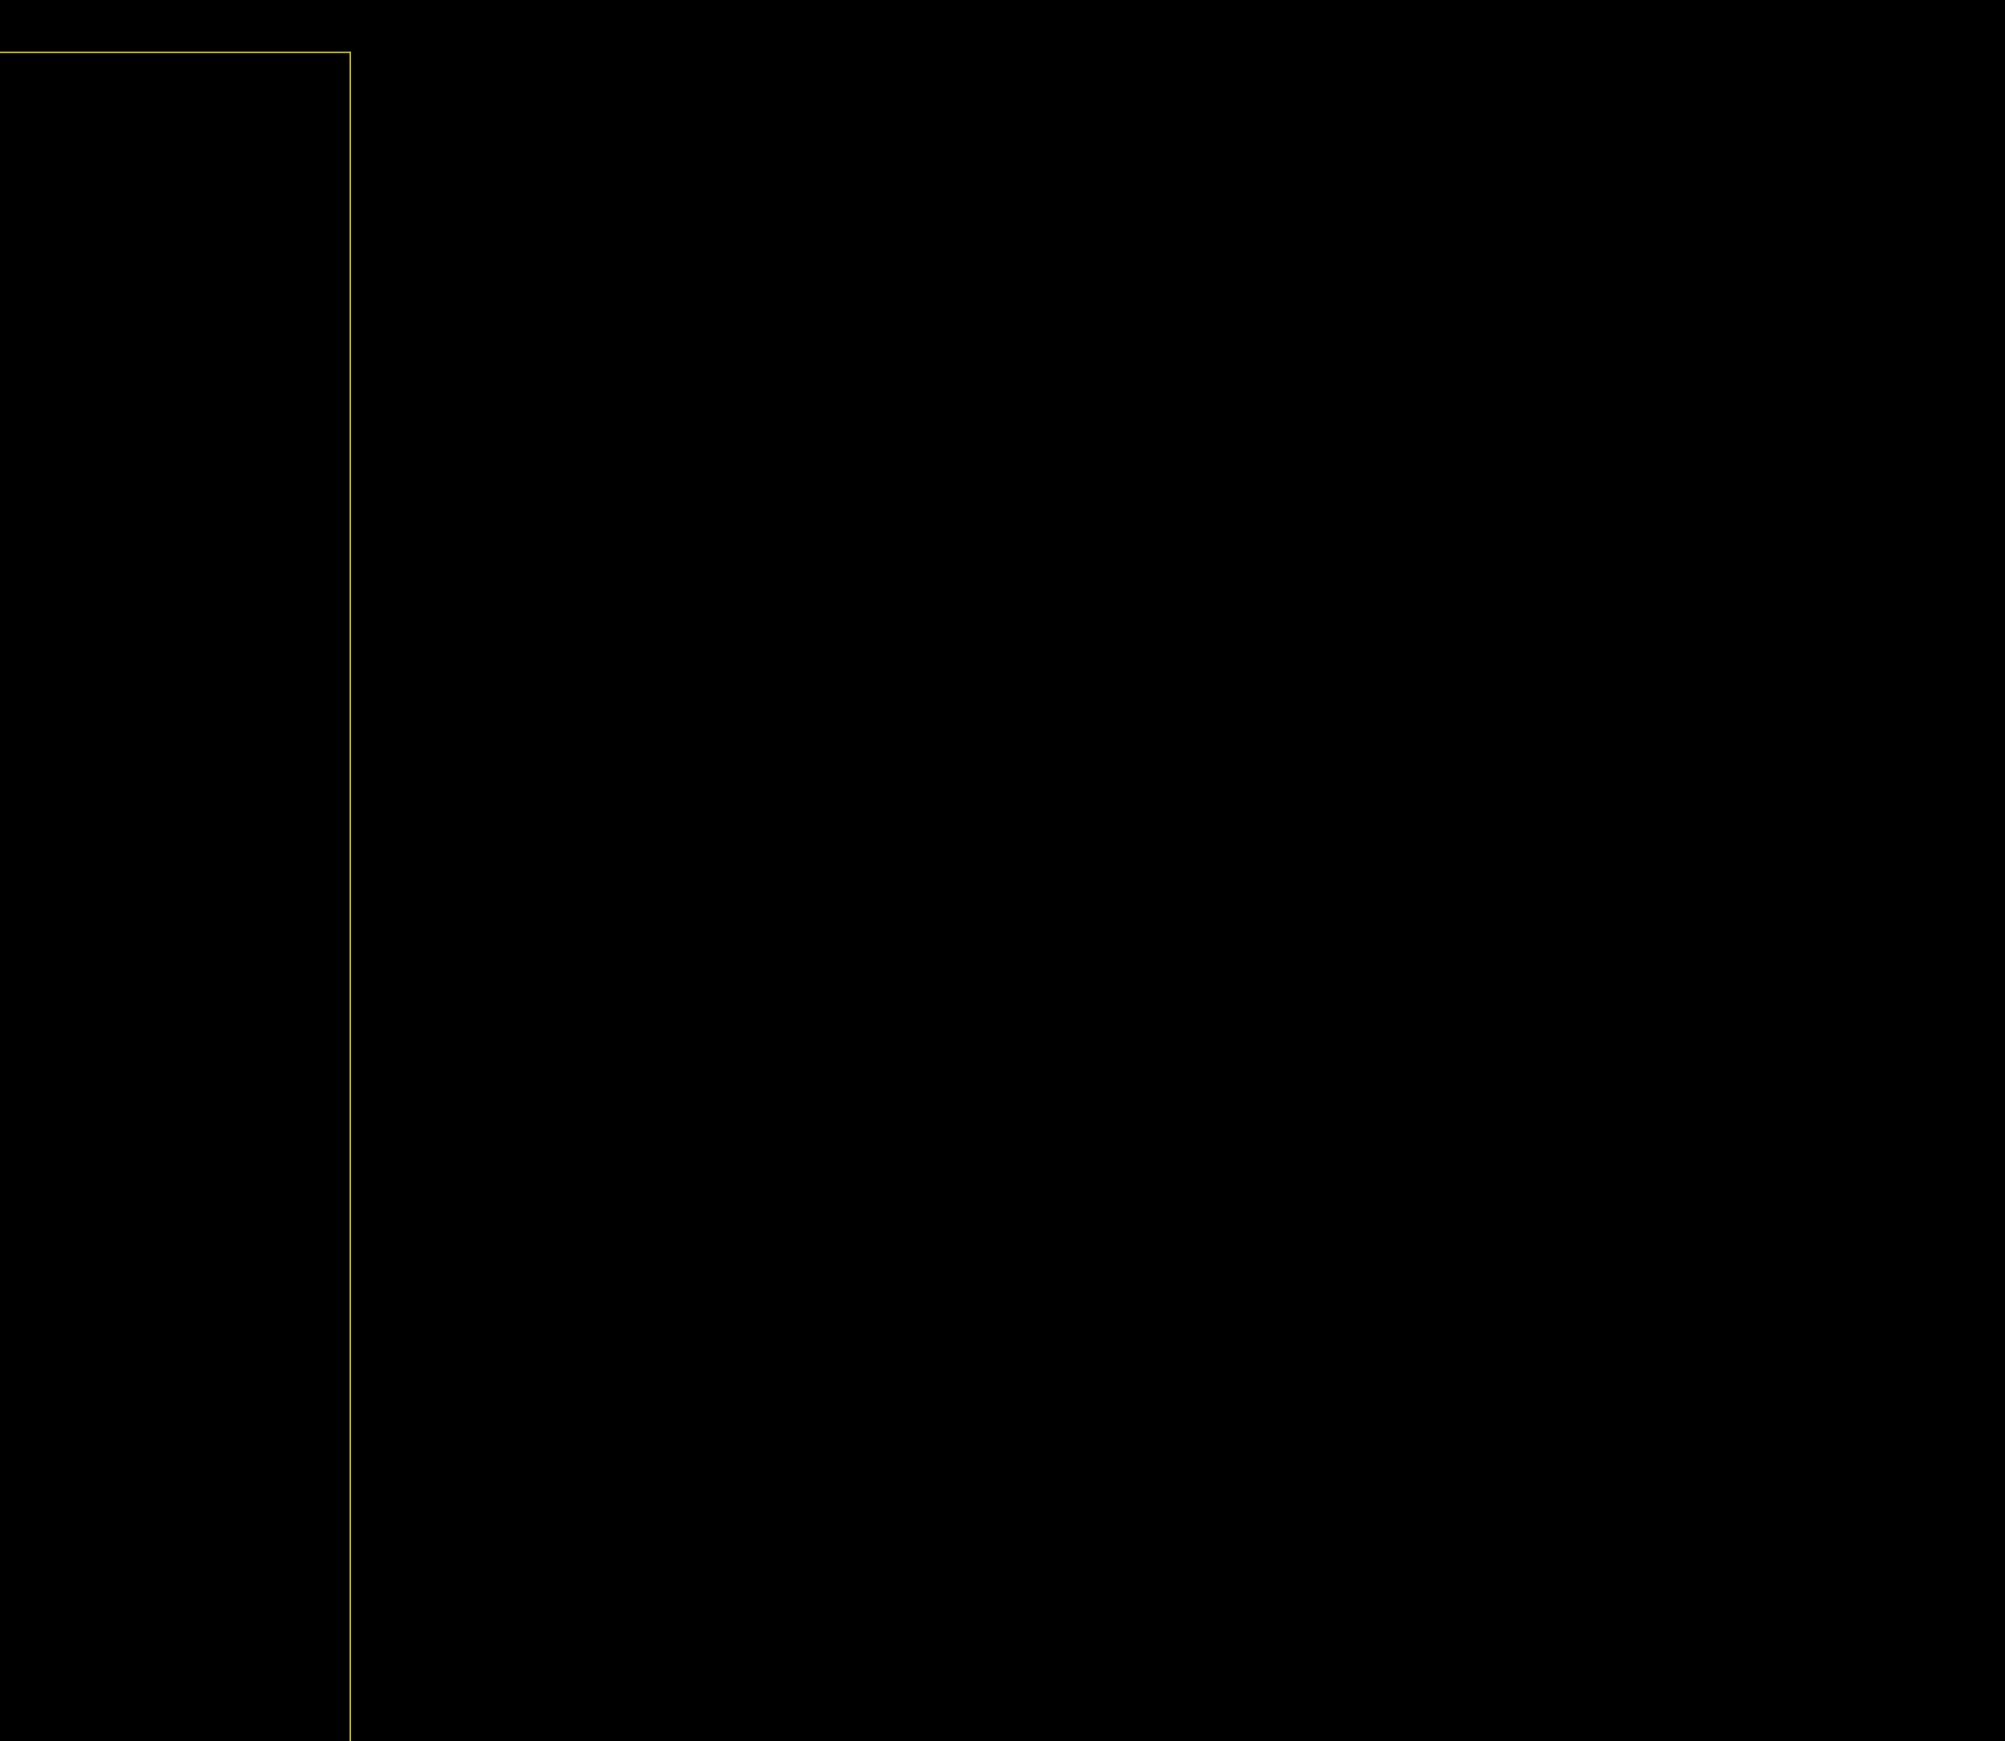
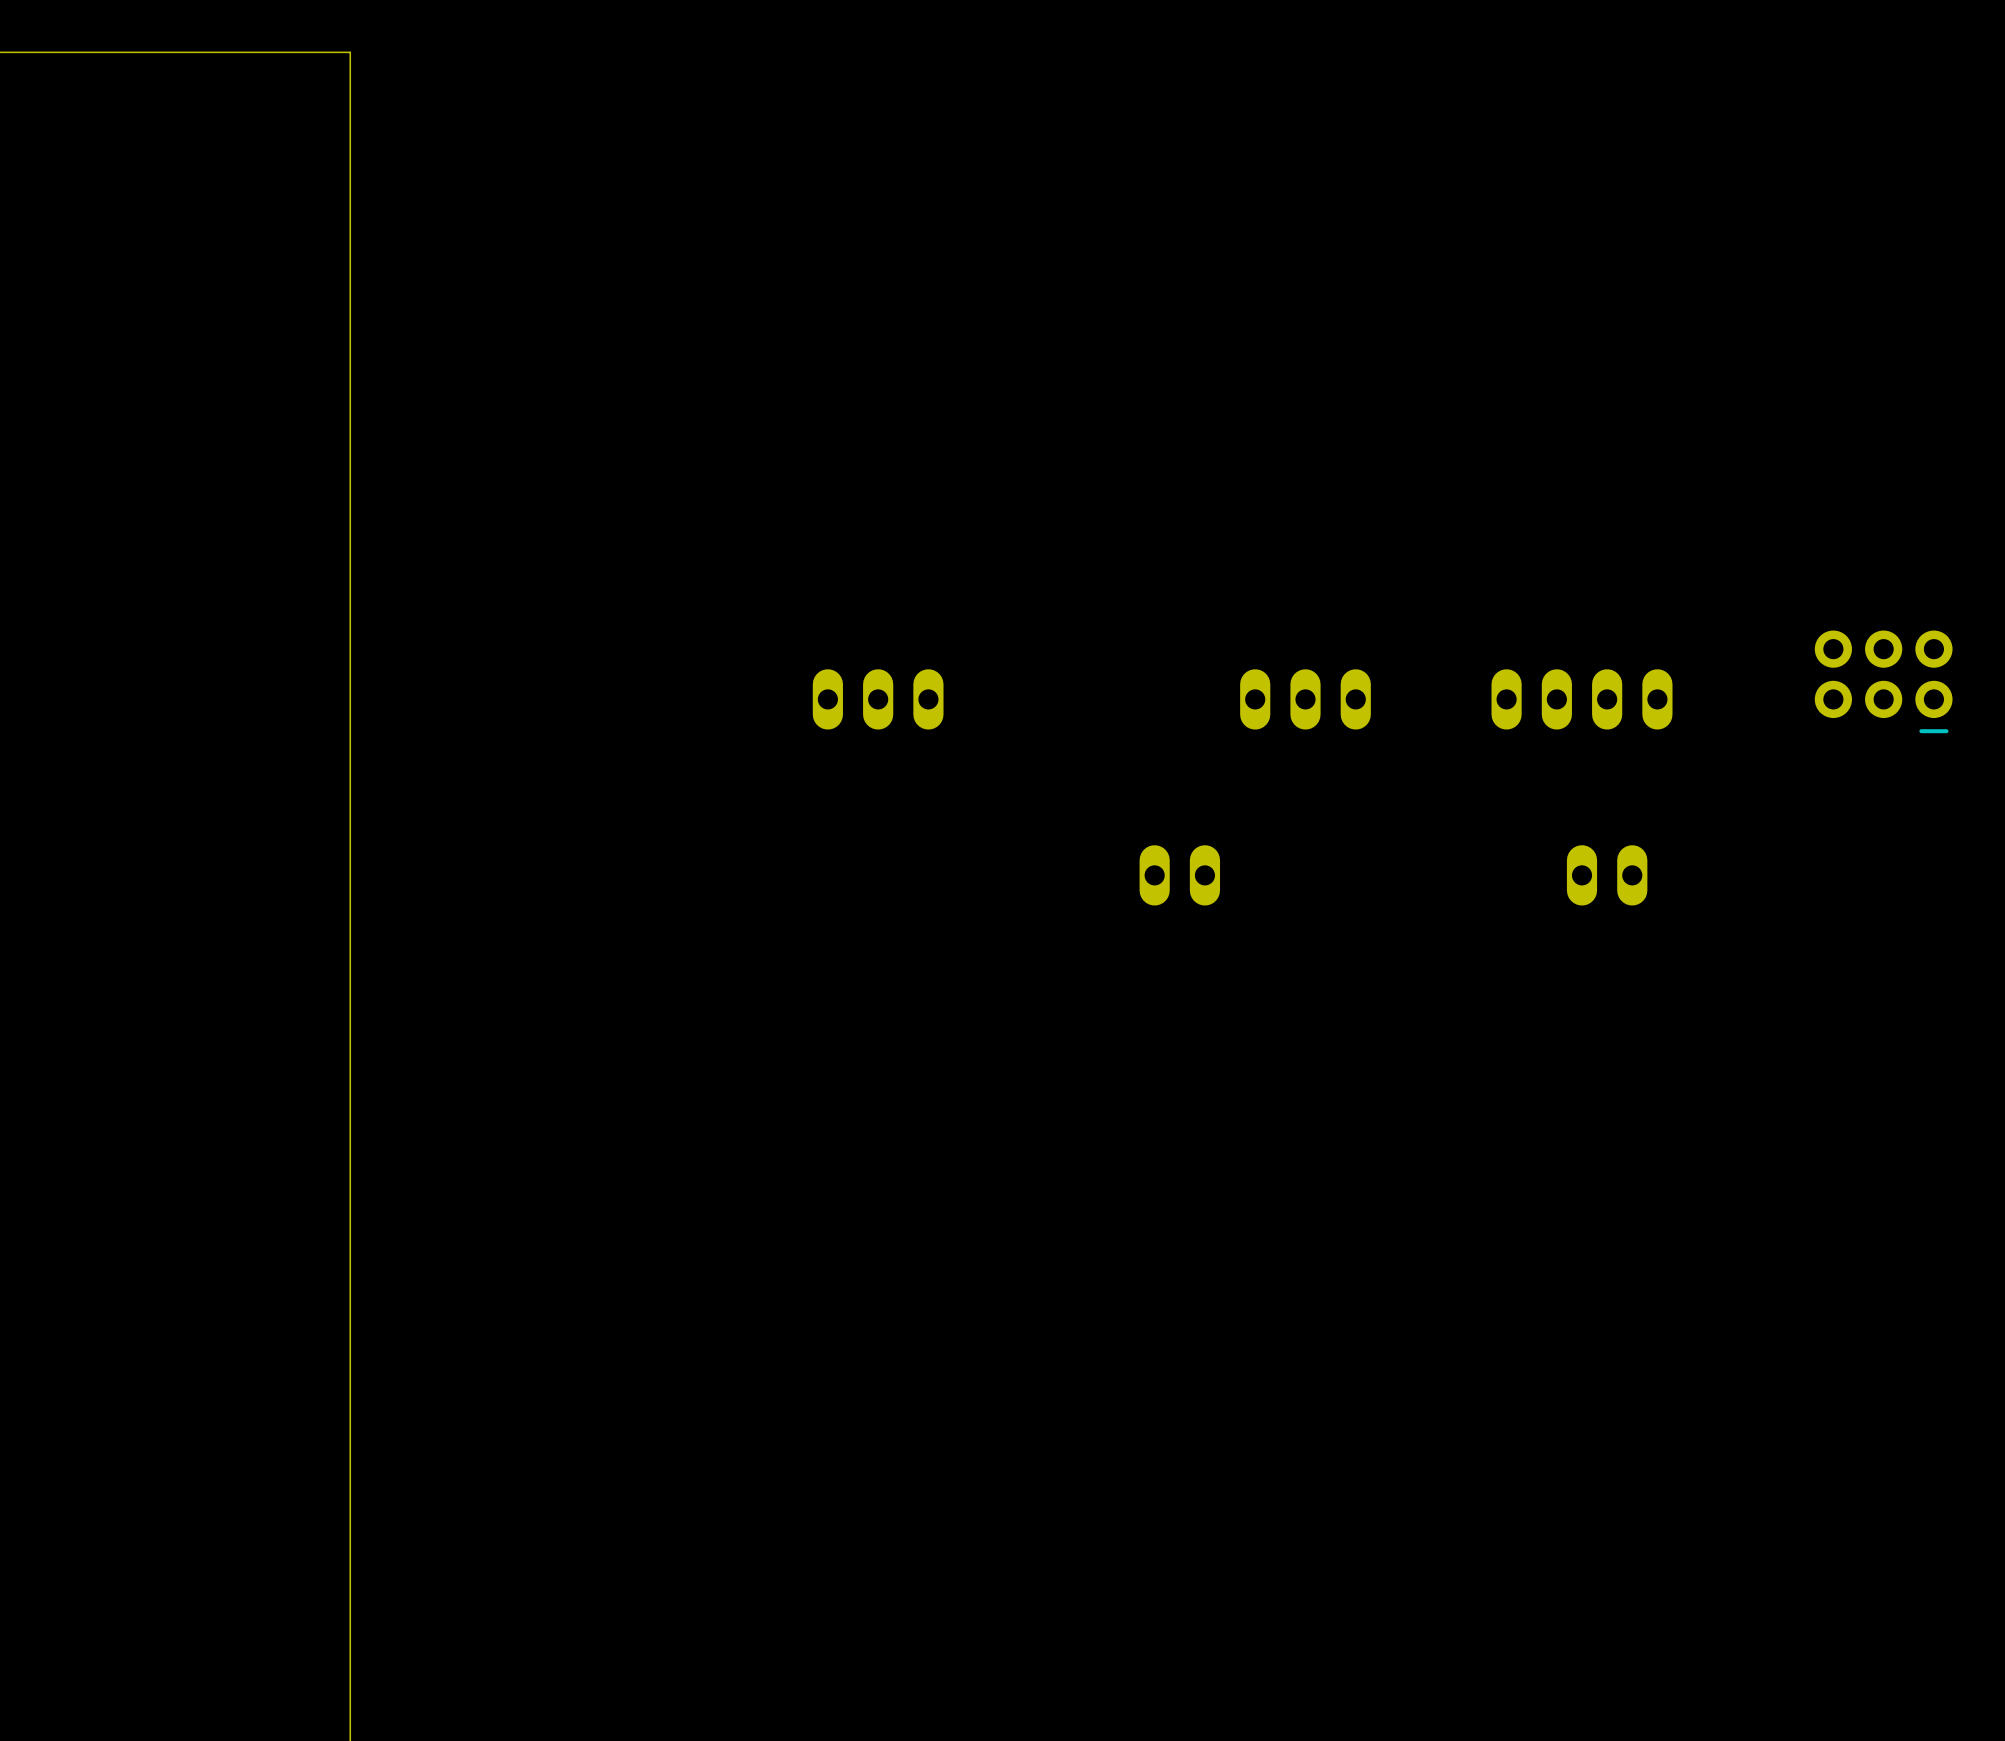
part: none -> (1883, 681)
part: none -> (878, 699)
part: none -> (1305, 699)
part: none -> (1582, 699)
part: none -> (1179, 875)
part: none -> (1607, 875)

